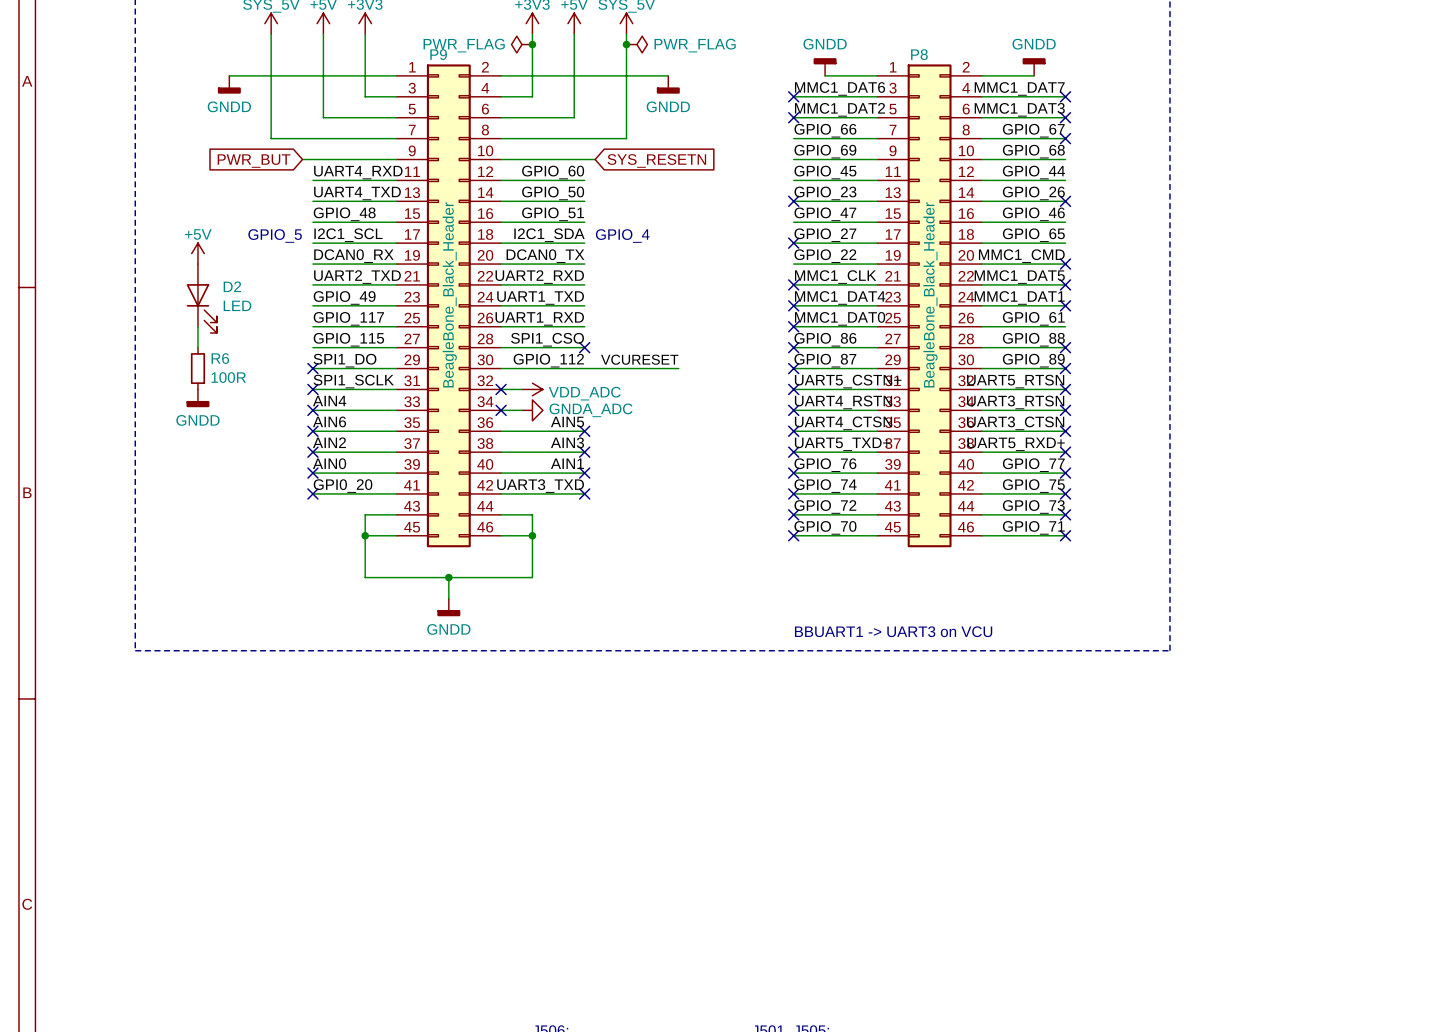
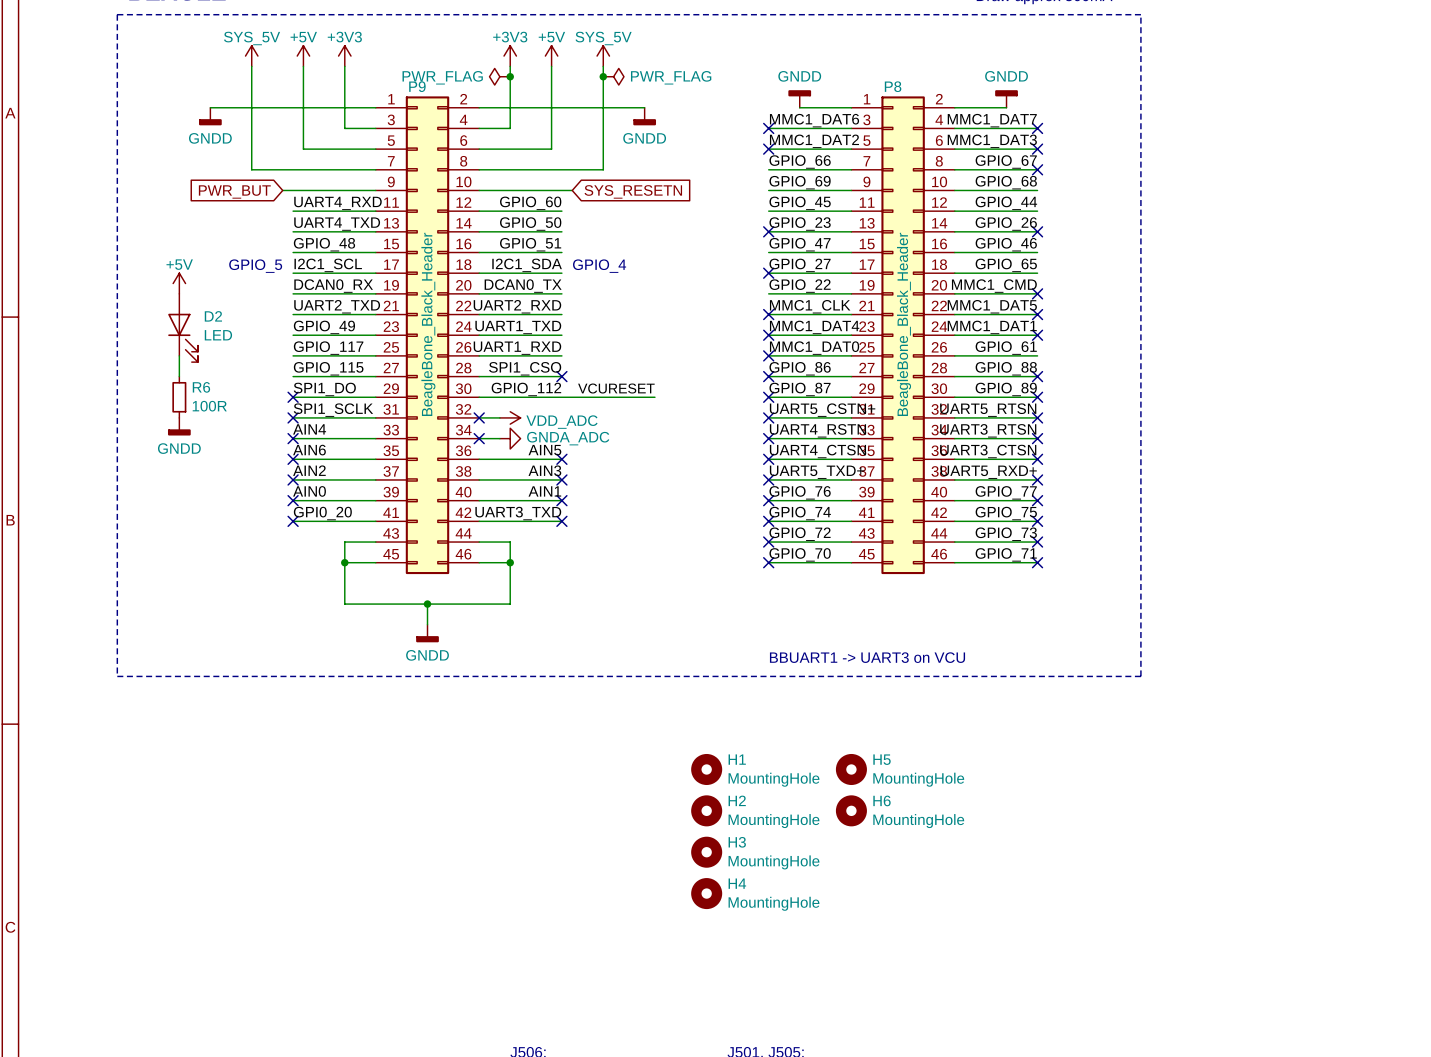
H1: none -> MountingHole (706, 769)
H5: none -> MountingHole (851, 769)
H2: none -> MountingHole (706, 810)
H6: none -> MountingHole (851, 810)
H3: none -> MountingHole (706, 852)
H4: none -> MountingHole (706, 893)

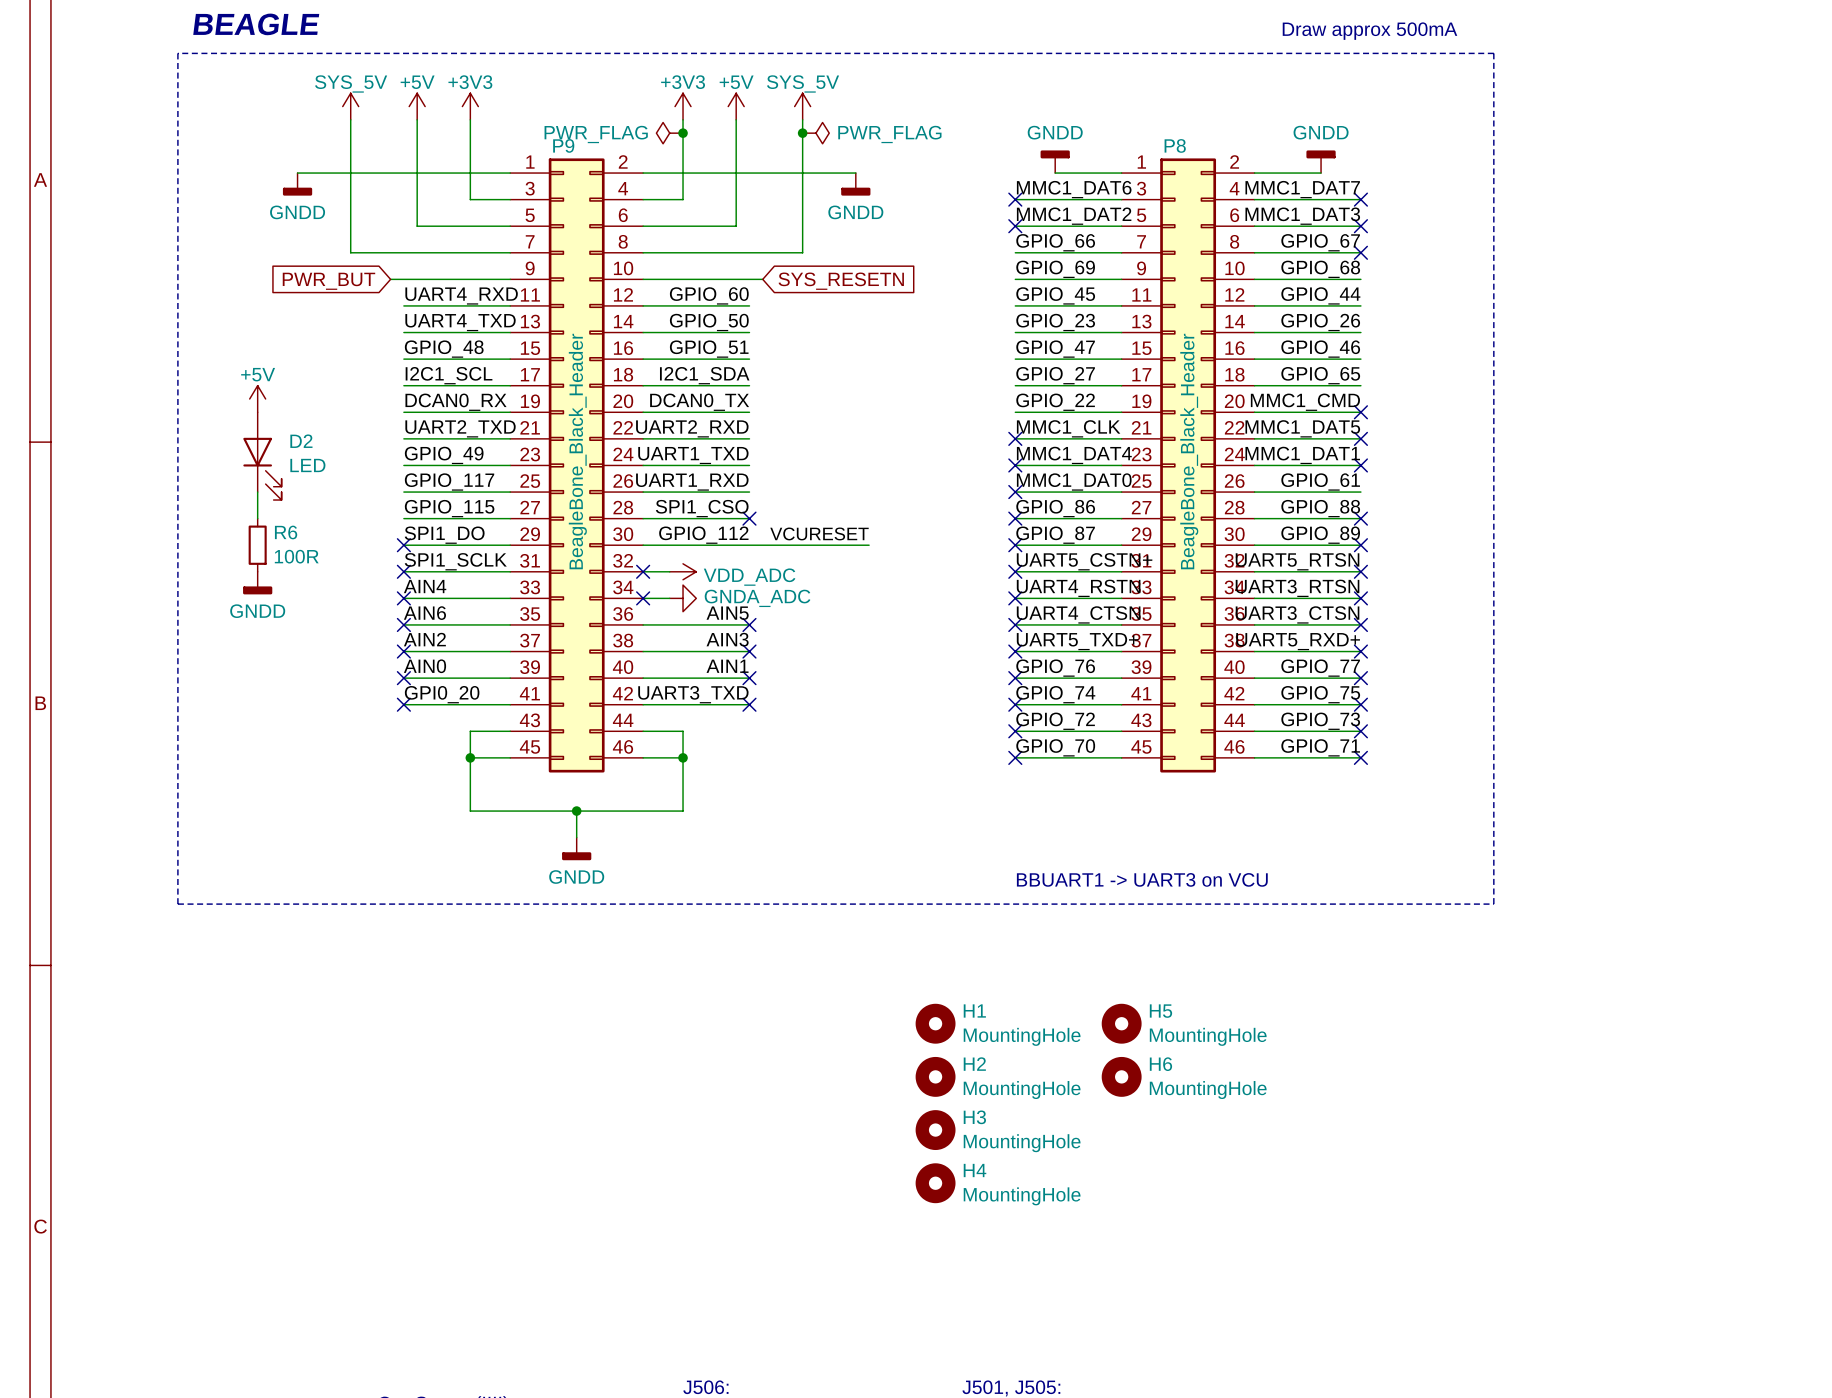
no-connect mark: (768, 231) -> none
no-connect mark: (1037, 231) -> none
text: GPIO_5 (255, 266) -> none
text: GPIO_4 (599, 266) -> none
no-connect mark: (768, 273) -> none

